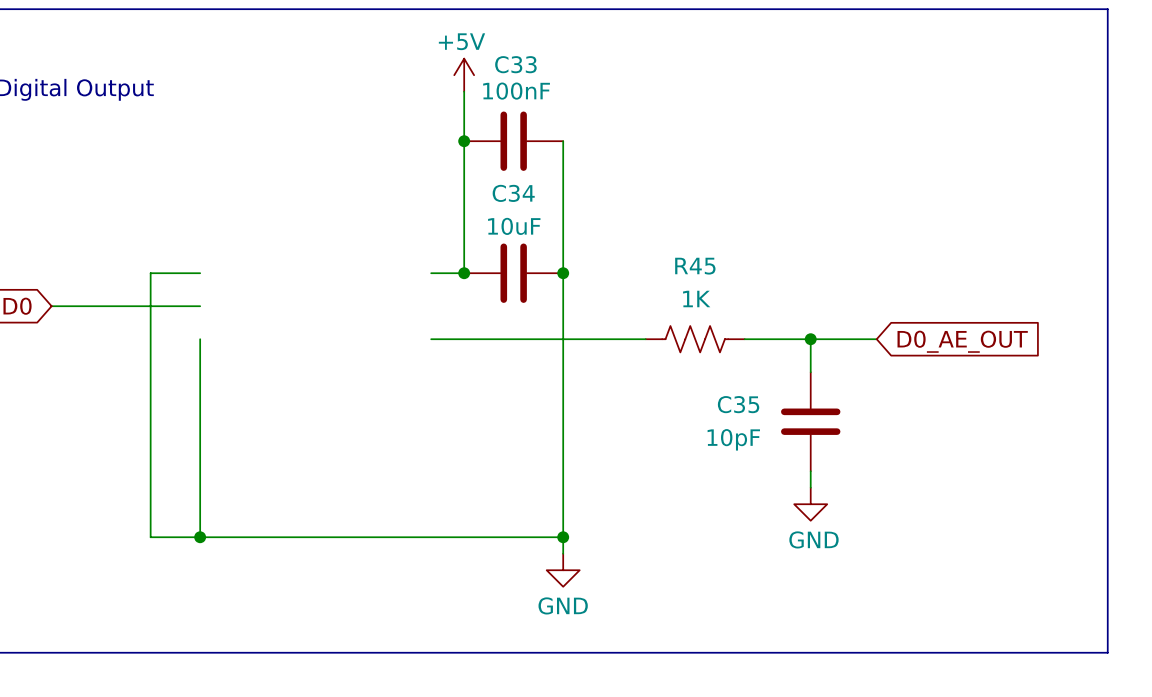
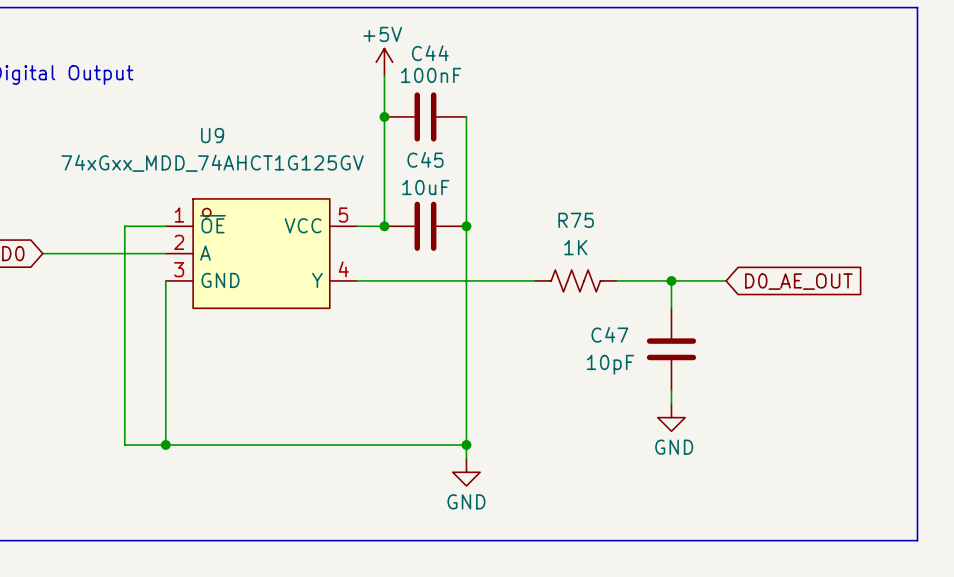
C33 name: C33 (515, 64) -> C44 (430, 53)
C34 name: C34 (513, 193) -> C45 (425, 159)
R45 name: R45 (695, 266) -> R75 (576, 220)
U9: none -> 74xGxx_MDD_74AHCT1G125GV (261, 253)
C35 name: C35 (738, 404) -> C47 (609, 334)

